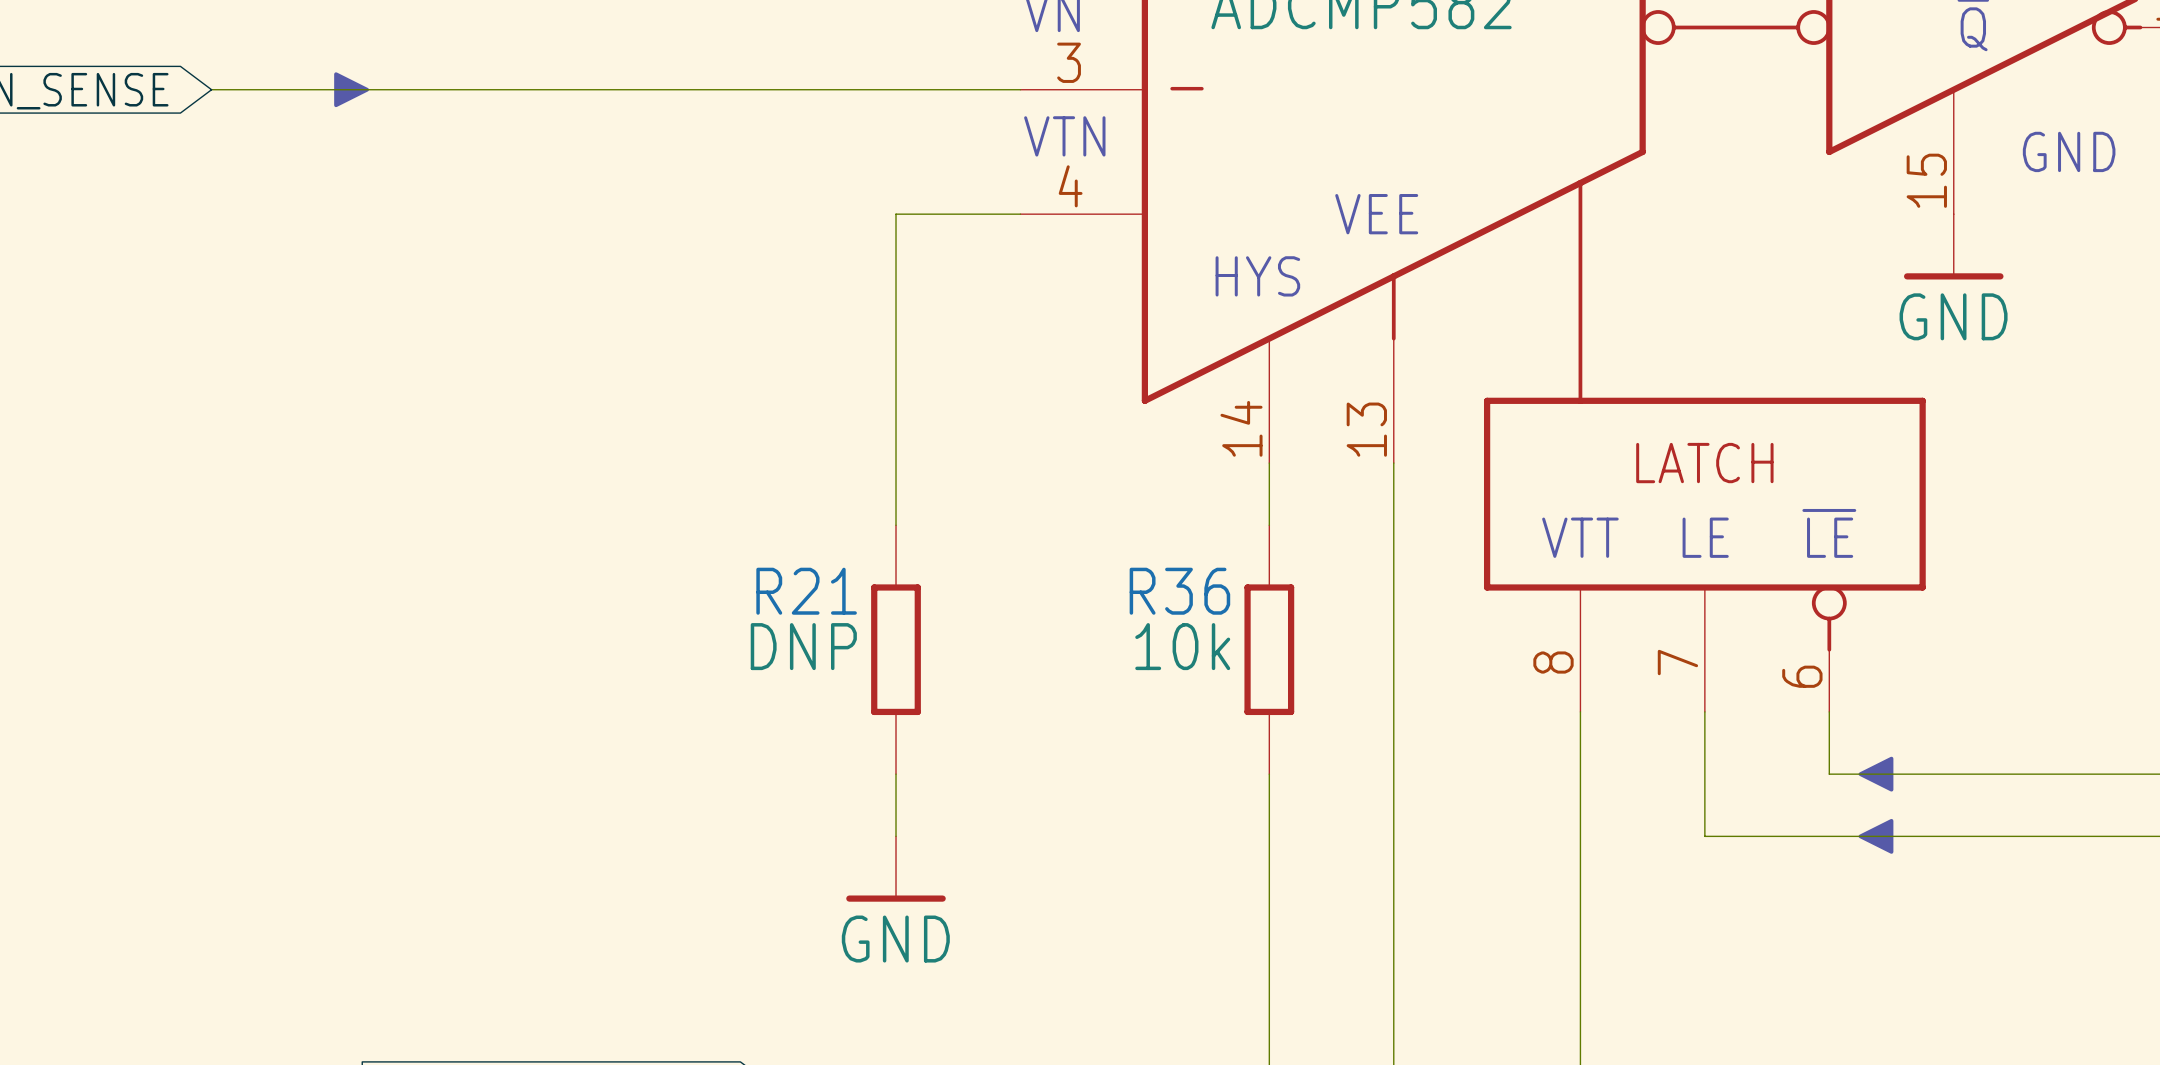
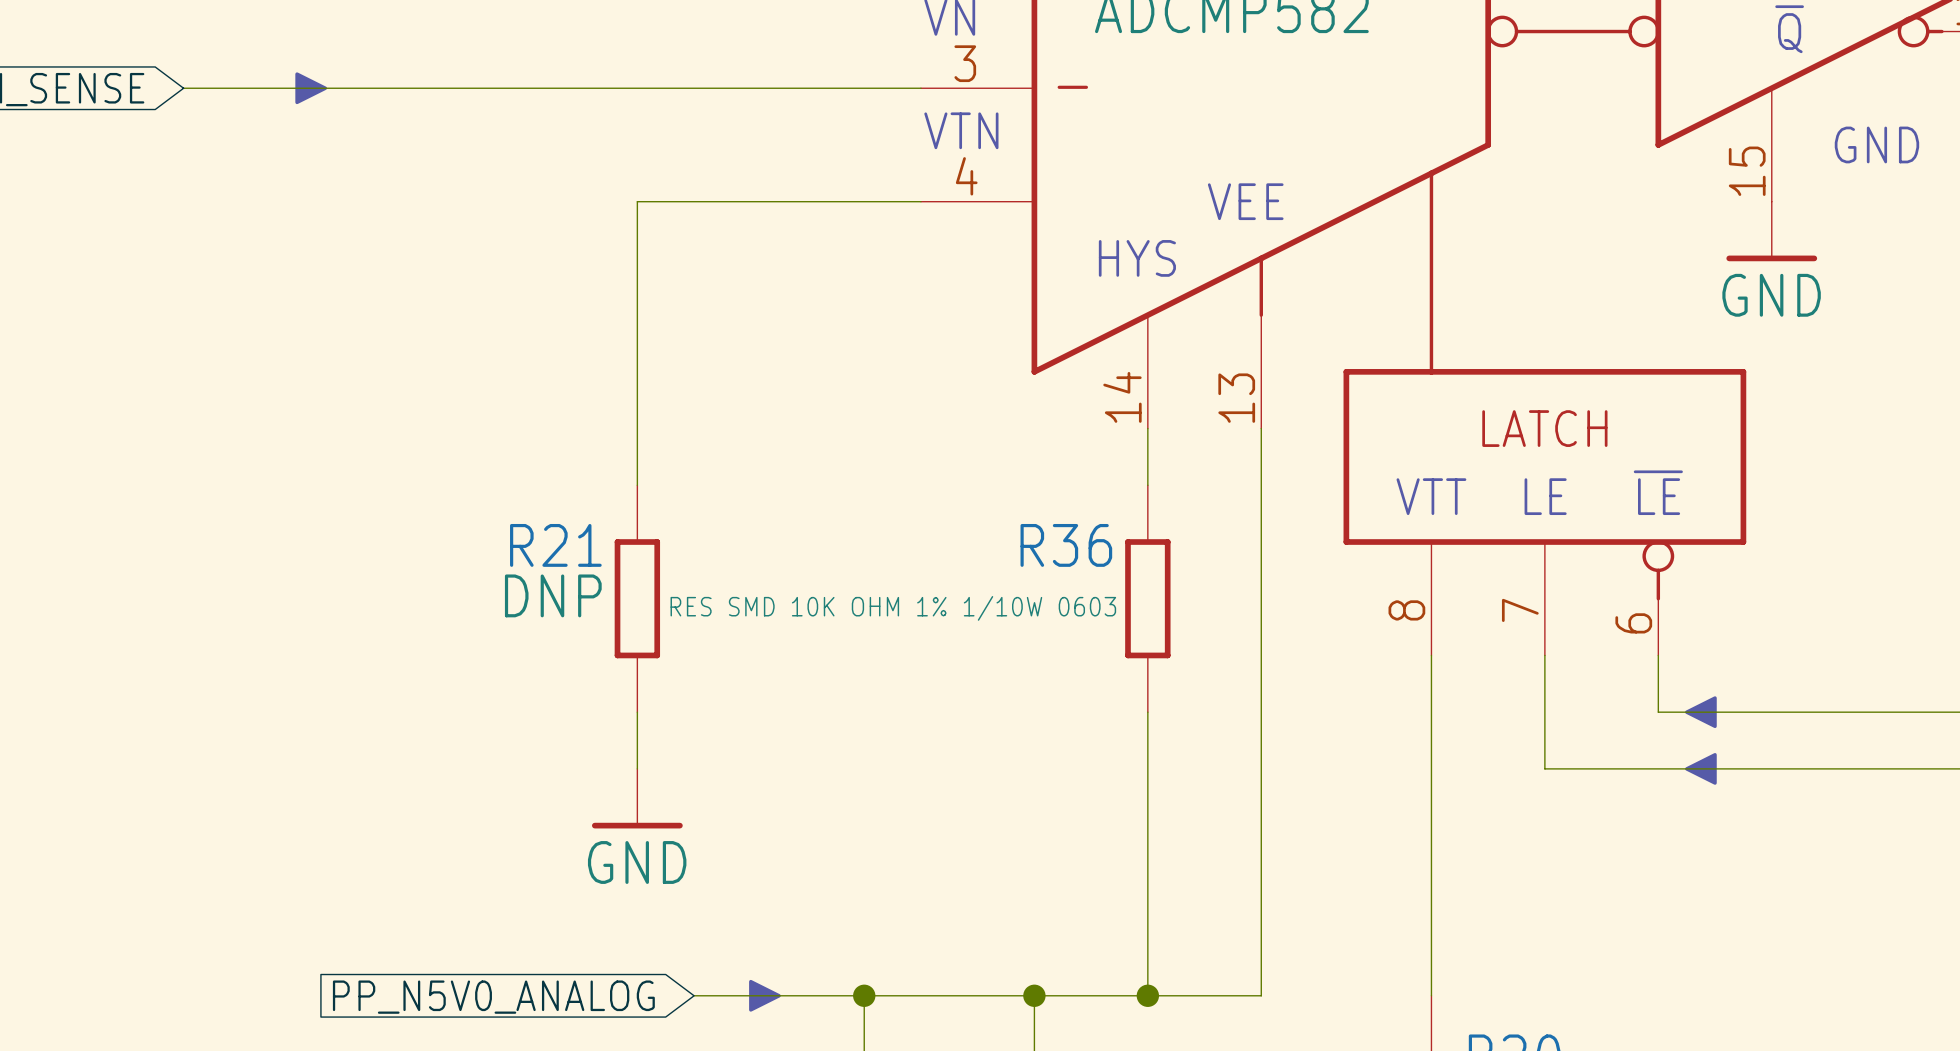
wire: (896, 214) (896, 525) -> (807, 201) (637, 201) (637, 485)
R36 value: 10k (1182, 646) -> RES SMD 10K OHM 1% 1/10W 0603 (893, 608)
R21 position: (896, 649) -> (637, 598)
wire: (896, 774) (896, 836) -> (637, 712) (637, 768)
power symbol position: GND (896, 869) -> GND (637, 798)

